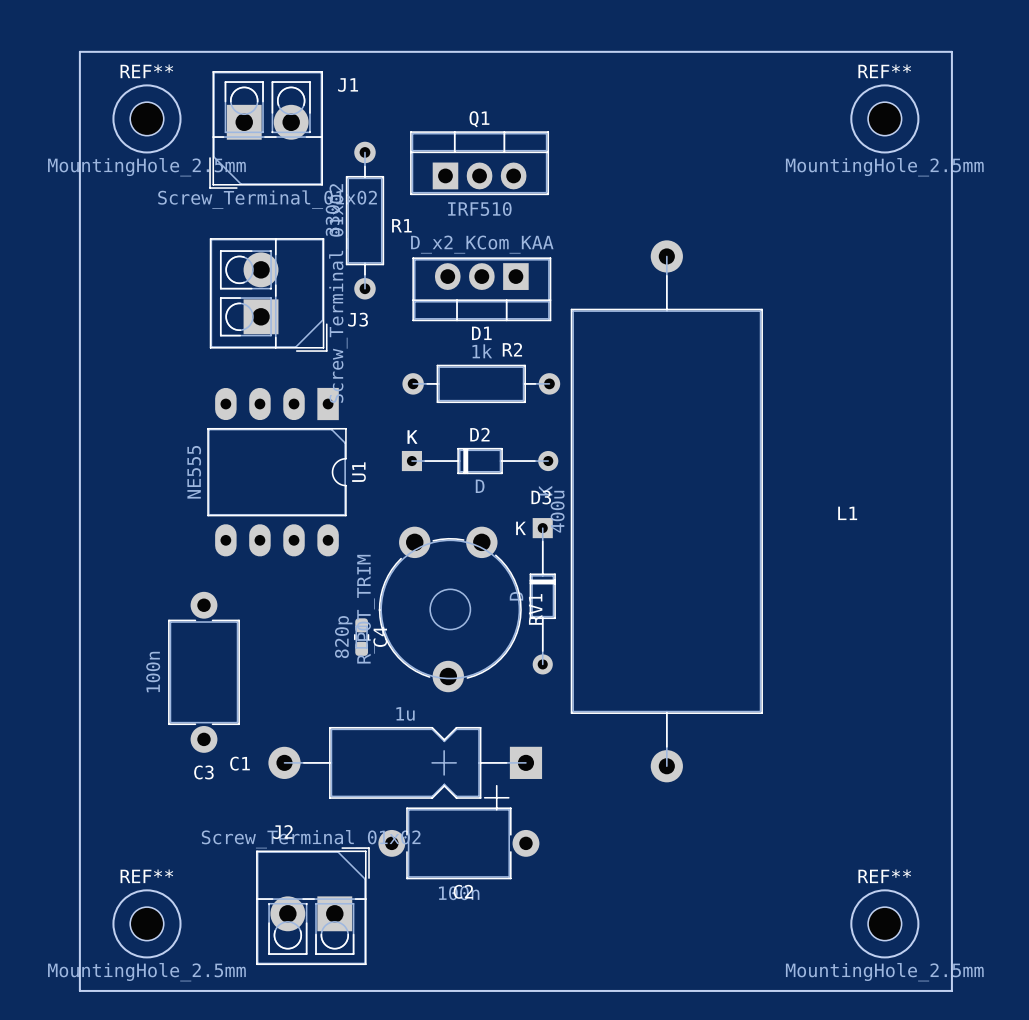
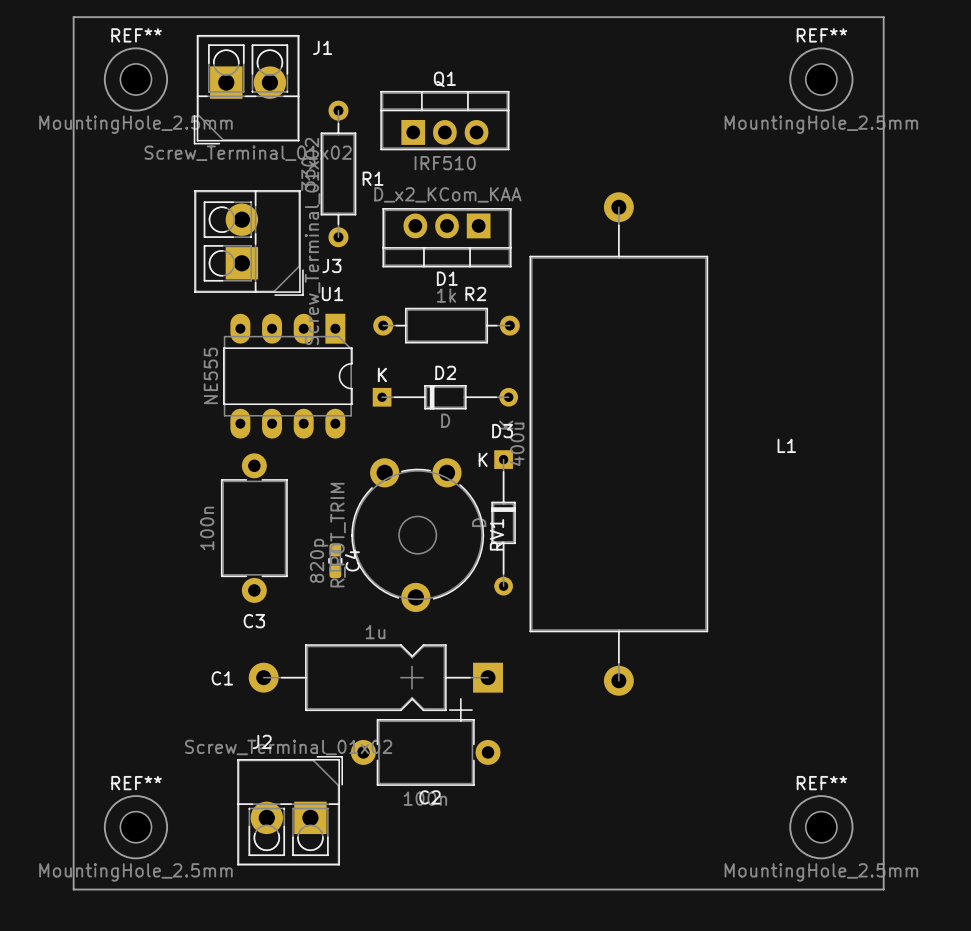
U1 footprint: [207, 387, 347, 557] -> [223, 313, 353, 439]
U1 name position: U1 (358, 472) -> U1 (332, 293)
C3 position: (203, 672) -> (254, 528)

